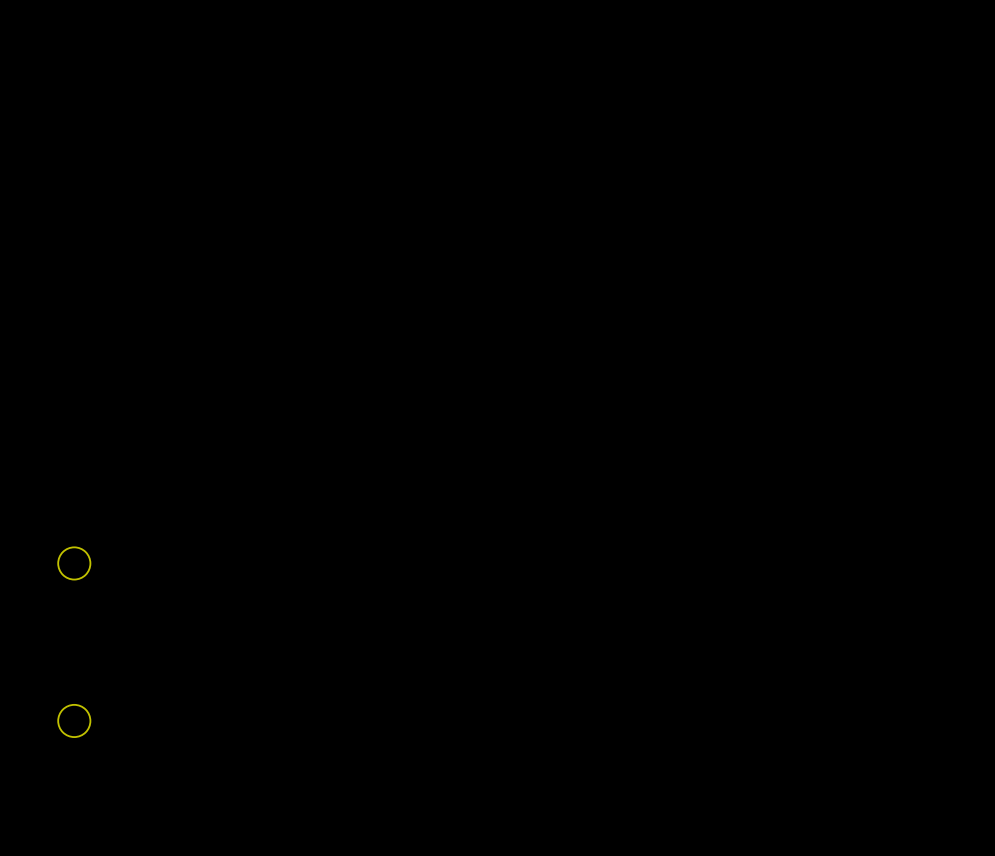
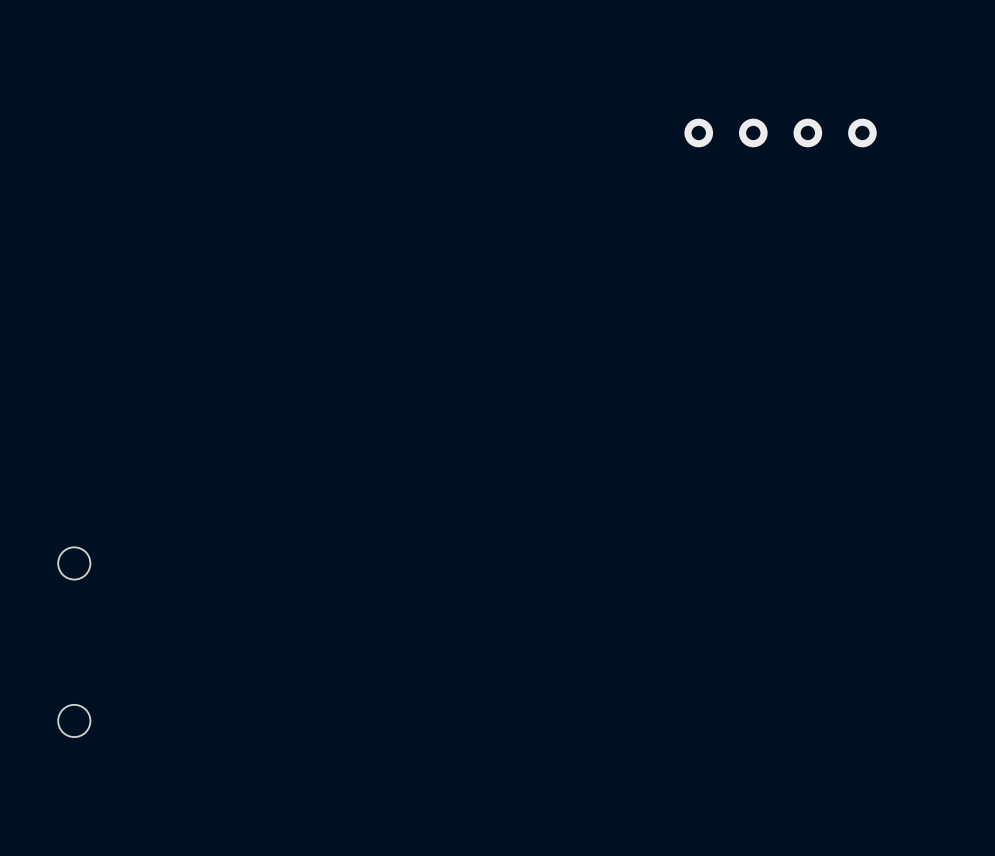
via: none -> (698, 132)
via: none -> (753, 132)
via: none -> (807, 132)
via: none -> (862, 132)

